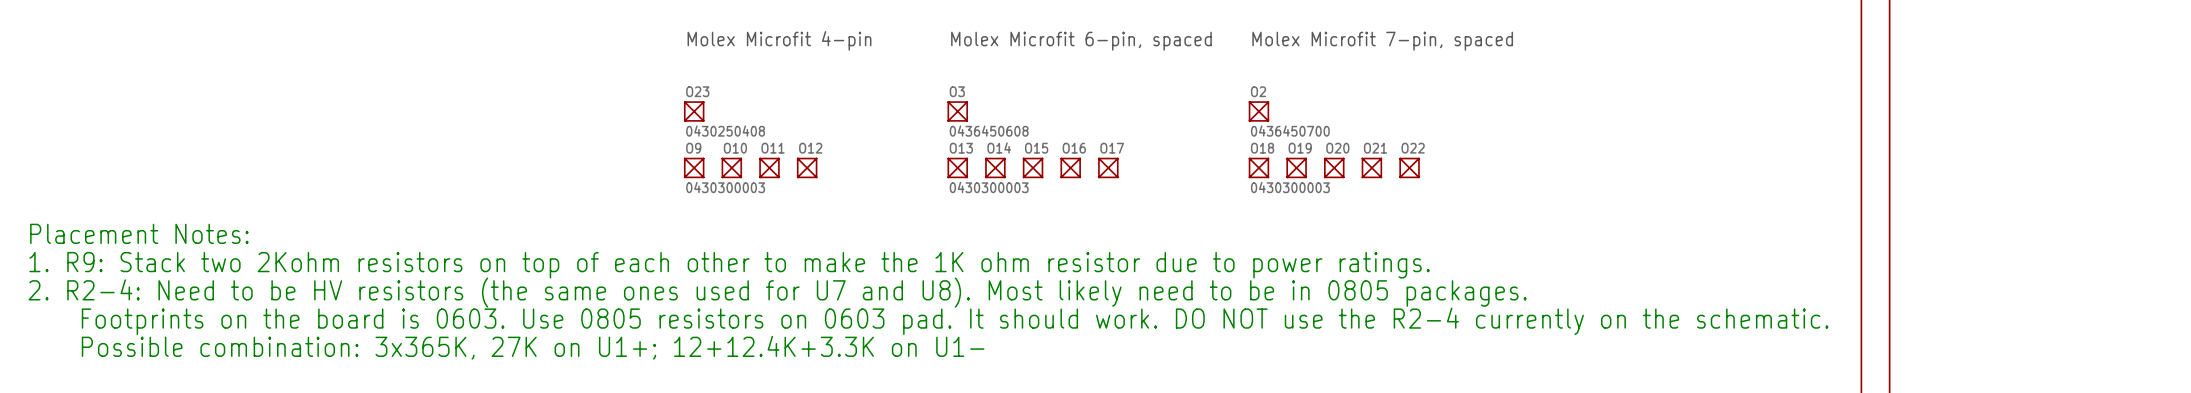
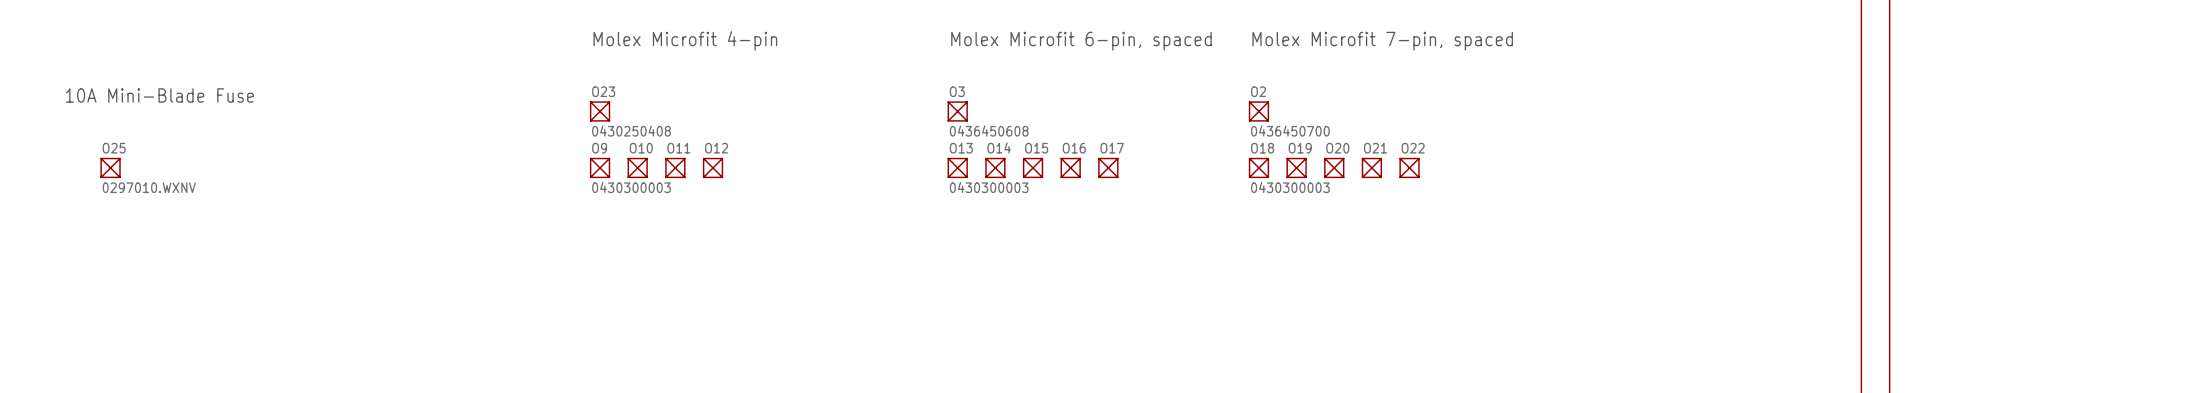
text position: Molex Microfit 4-pin (779, 40) -> Molex Microfit 4-pin (685, 40)
text: none -> 10A Mini-Blade Fuse (159, 95)
O23 position: (694, 111) -> (600, 111)
O25: none -> (110, 167)
O9 position: (694, 167) -> (600, 167)
O10 position: (731, 167) -> (637, 167)
O11 position: (769, 167) -> (675, 167)
O12 position: (807, 167) -> (713, 167)
text: Placement Notes: (139, 233) -> none
text: 1. R9: Stack two 2Kohm resistors on top of each other to make the 1K ohm resistor due to power ratings. (729, 265) -> none
text: 2. R2-4: Need to be HV resistors (the same ones used for U7 and U8). Most likely need to be in 0805 packages. (777, 292) -> none
text: Footprints on the board is 0603. Use 0805 resistors on 0603 pad. It should work. DO NOT use the R2-4 currently on the schematic. (955, 321) -> none
text: Possible combination: 3x365K, 27K on U1+; 12+12.4K+3.3K on U1- (533, 347) -> none

